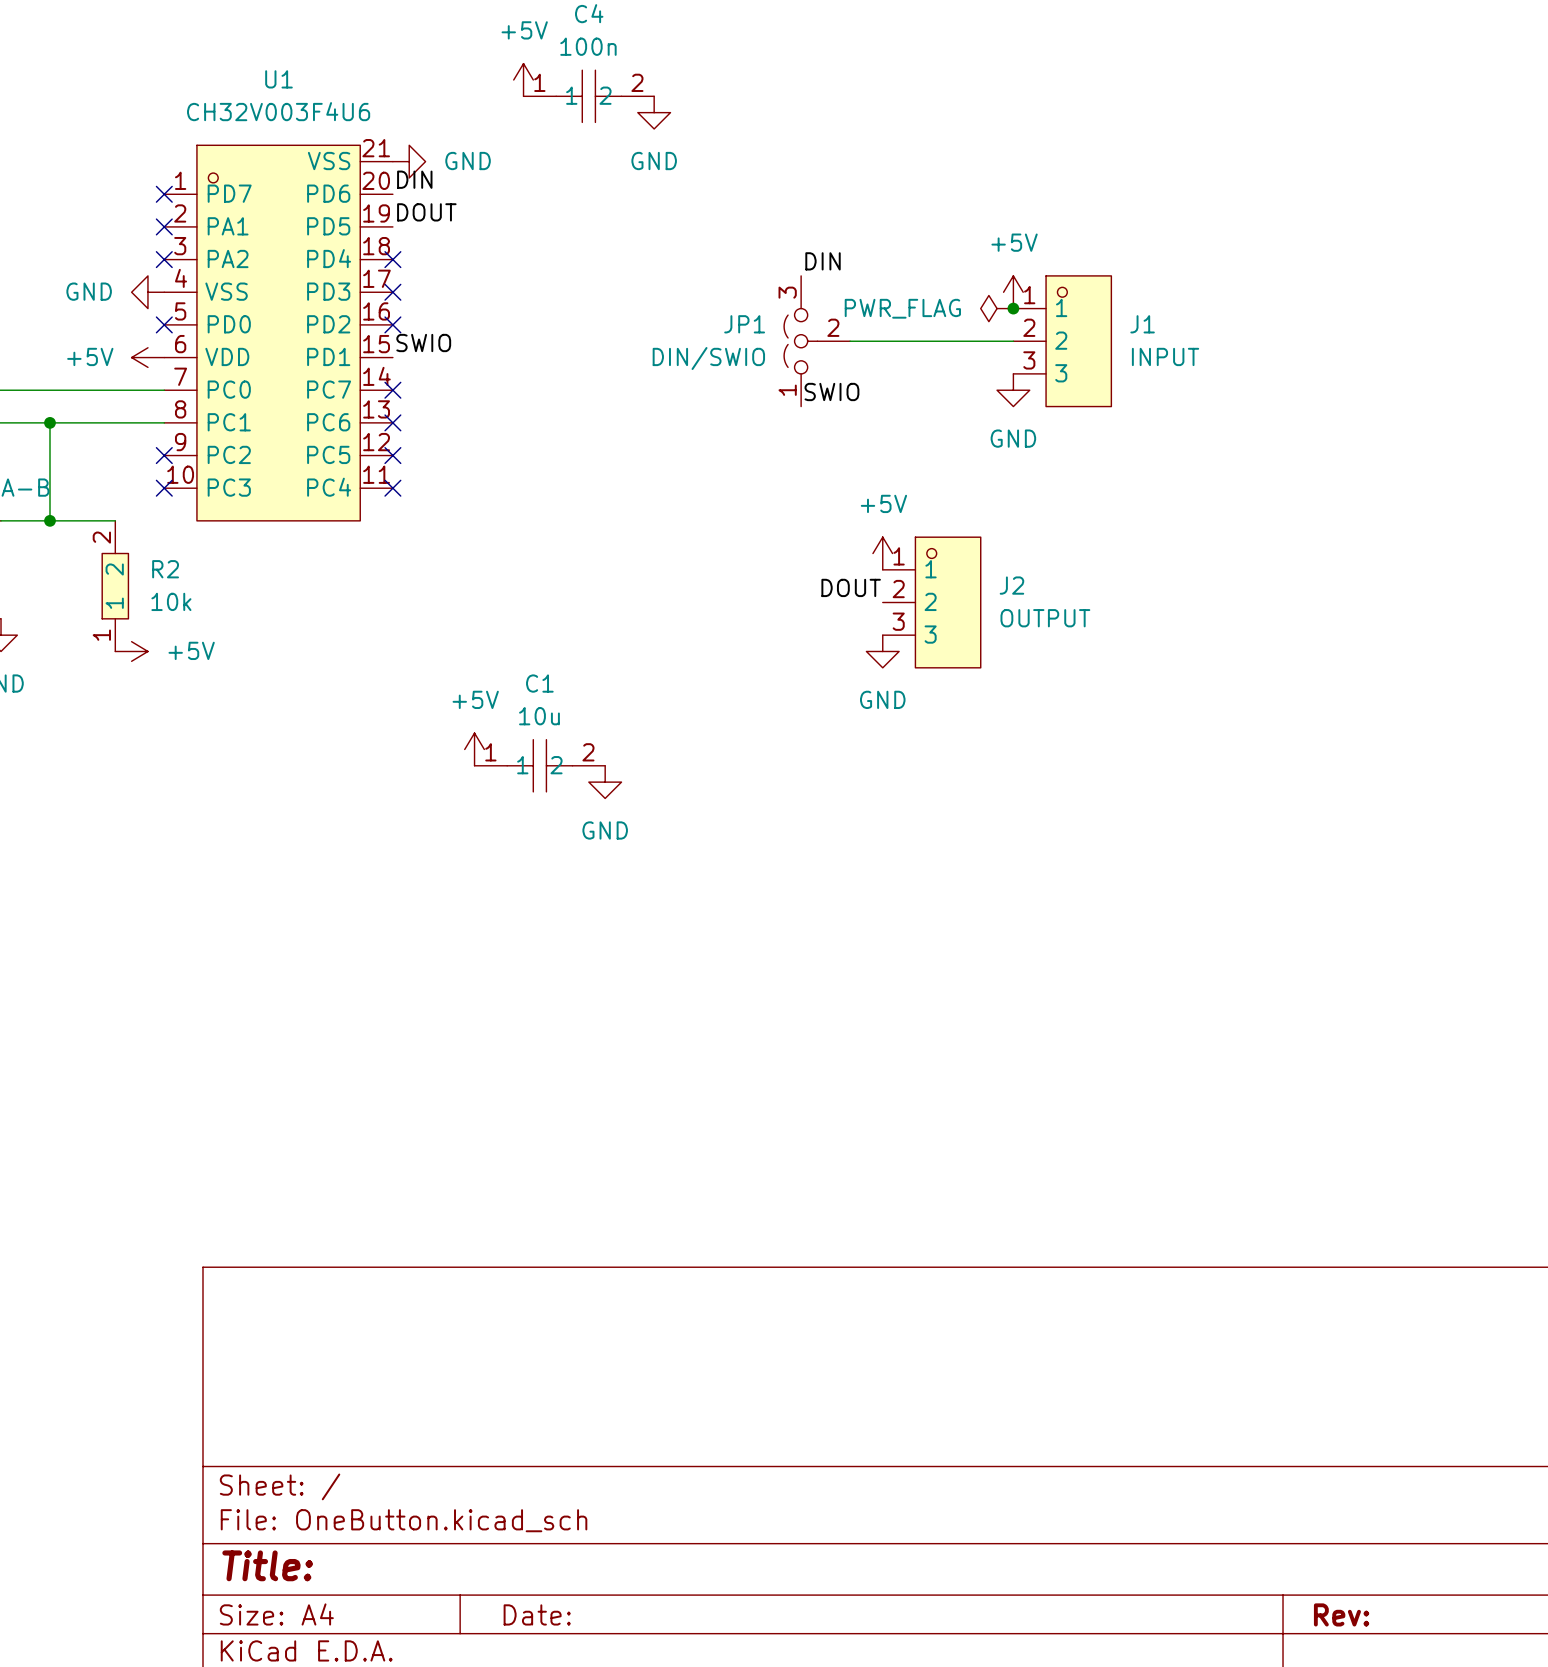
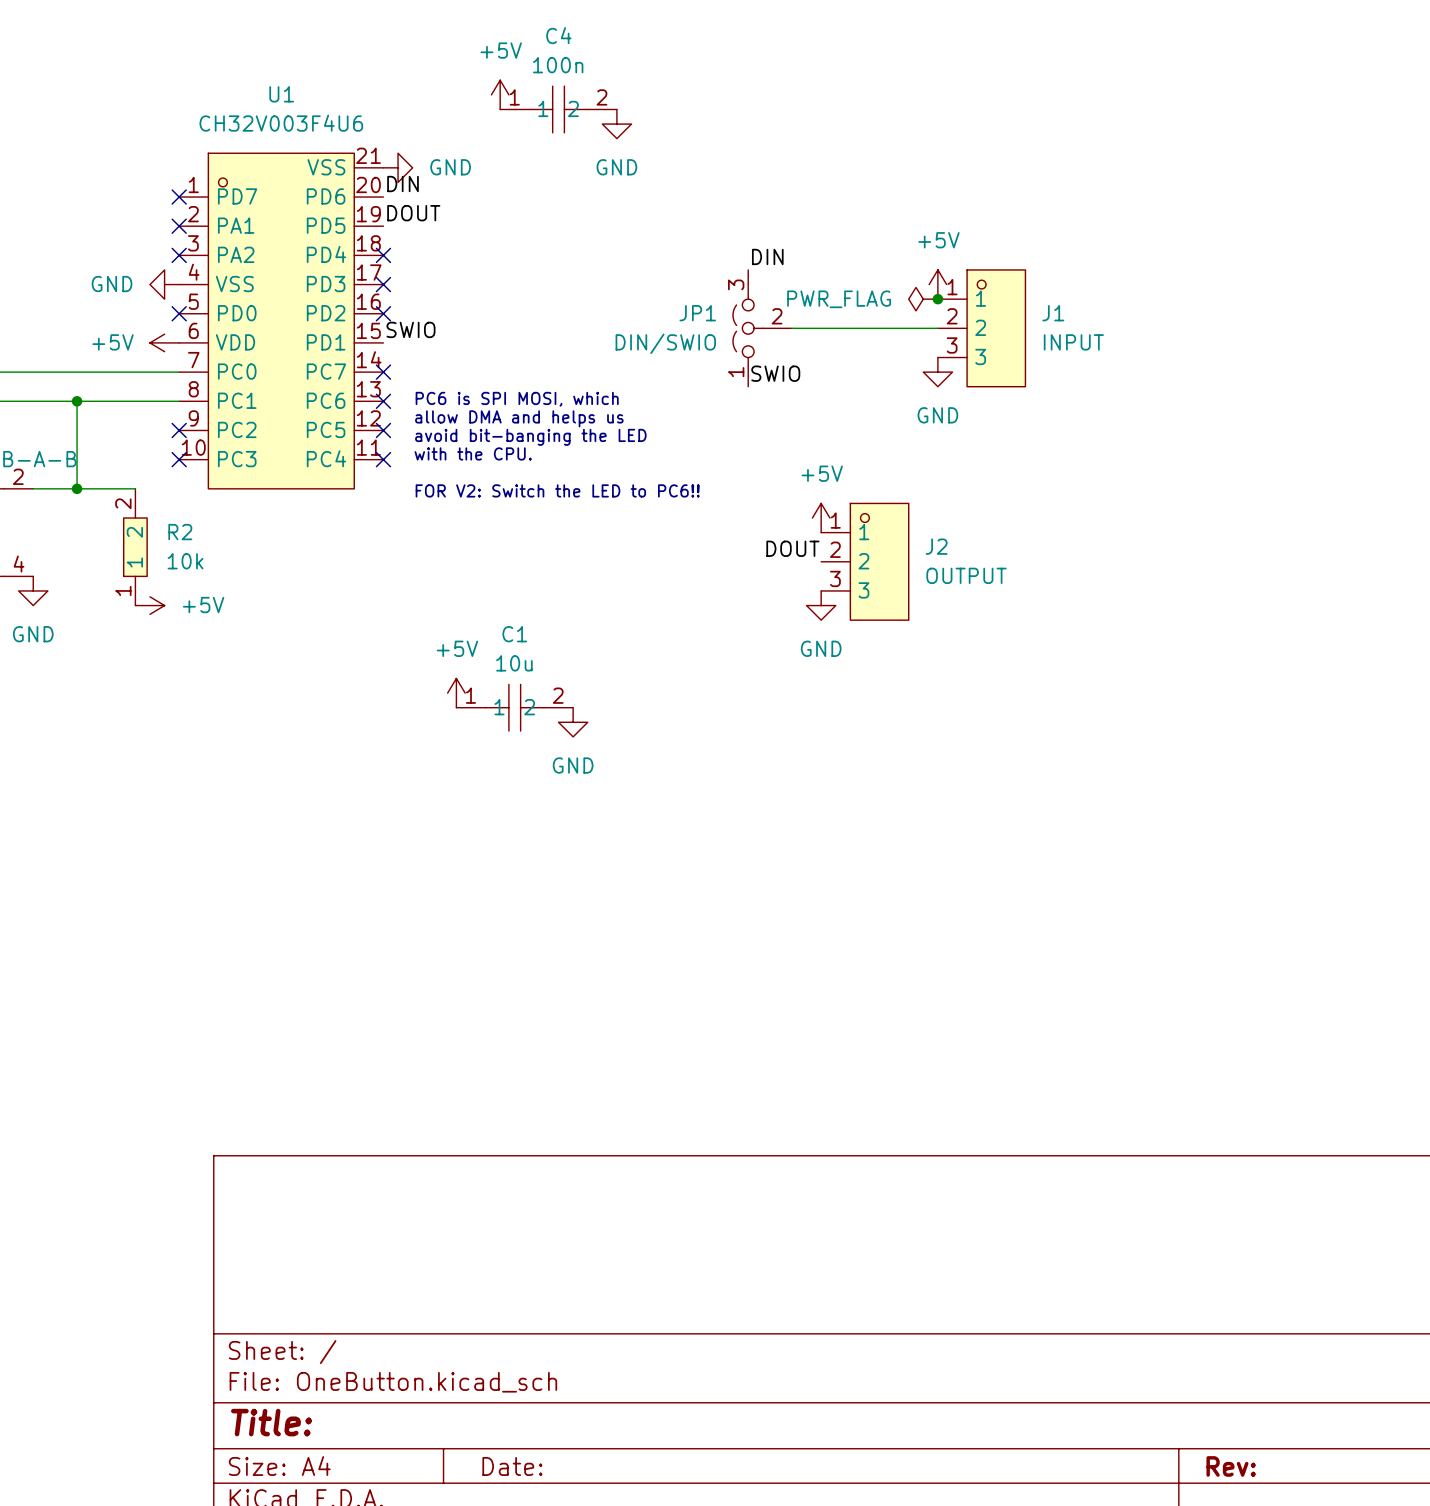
text: none -> PC6 is SPI MOSI, which (517, 399)
text: none -> allow DMA and helps us (519, 418)
text: none -> avoid bit-banging the LED (530, 437)
text: none -> with the CPU. (473, 453)
text: none -> FOR V2: Switch the LED to PC6!! (557, 490)

